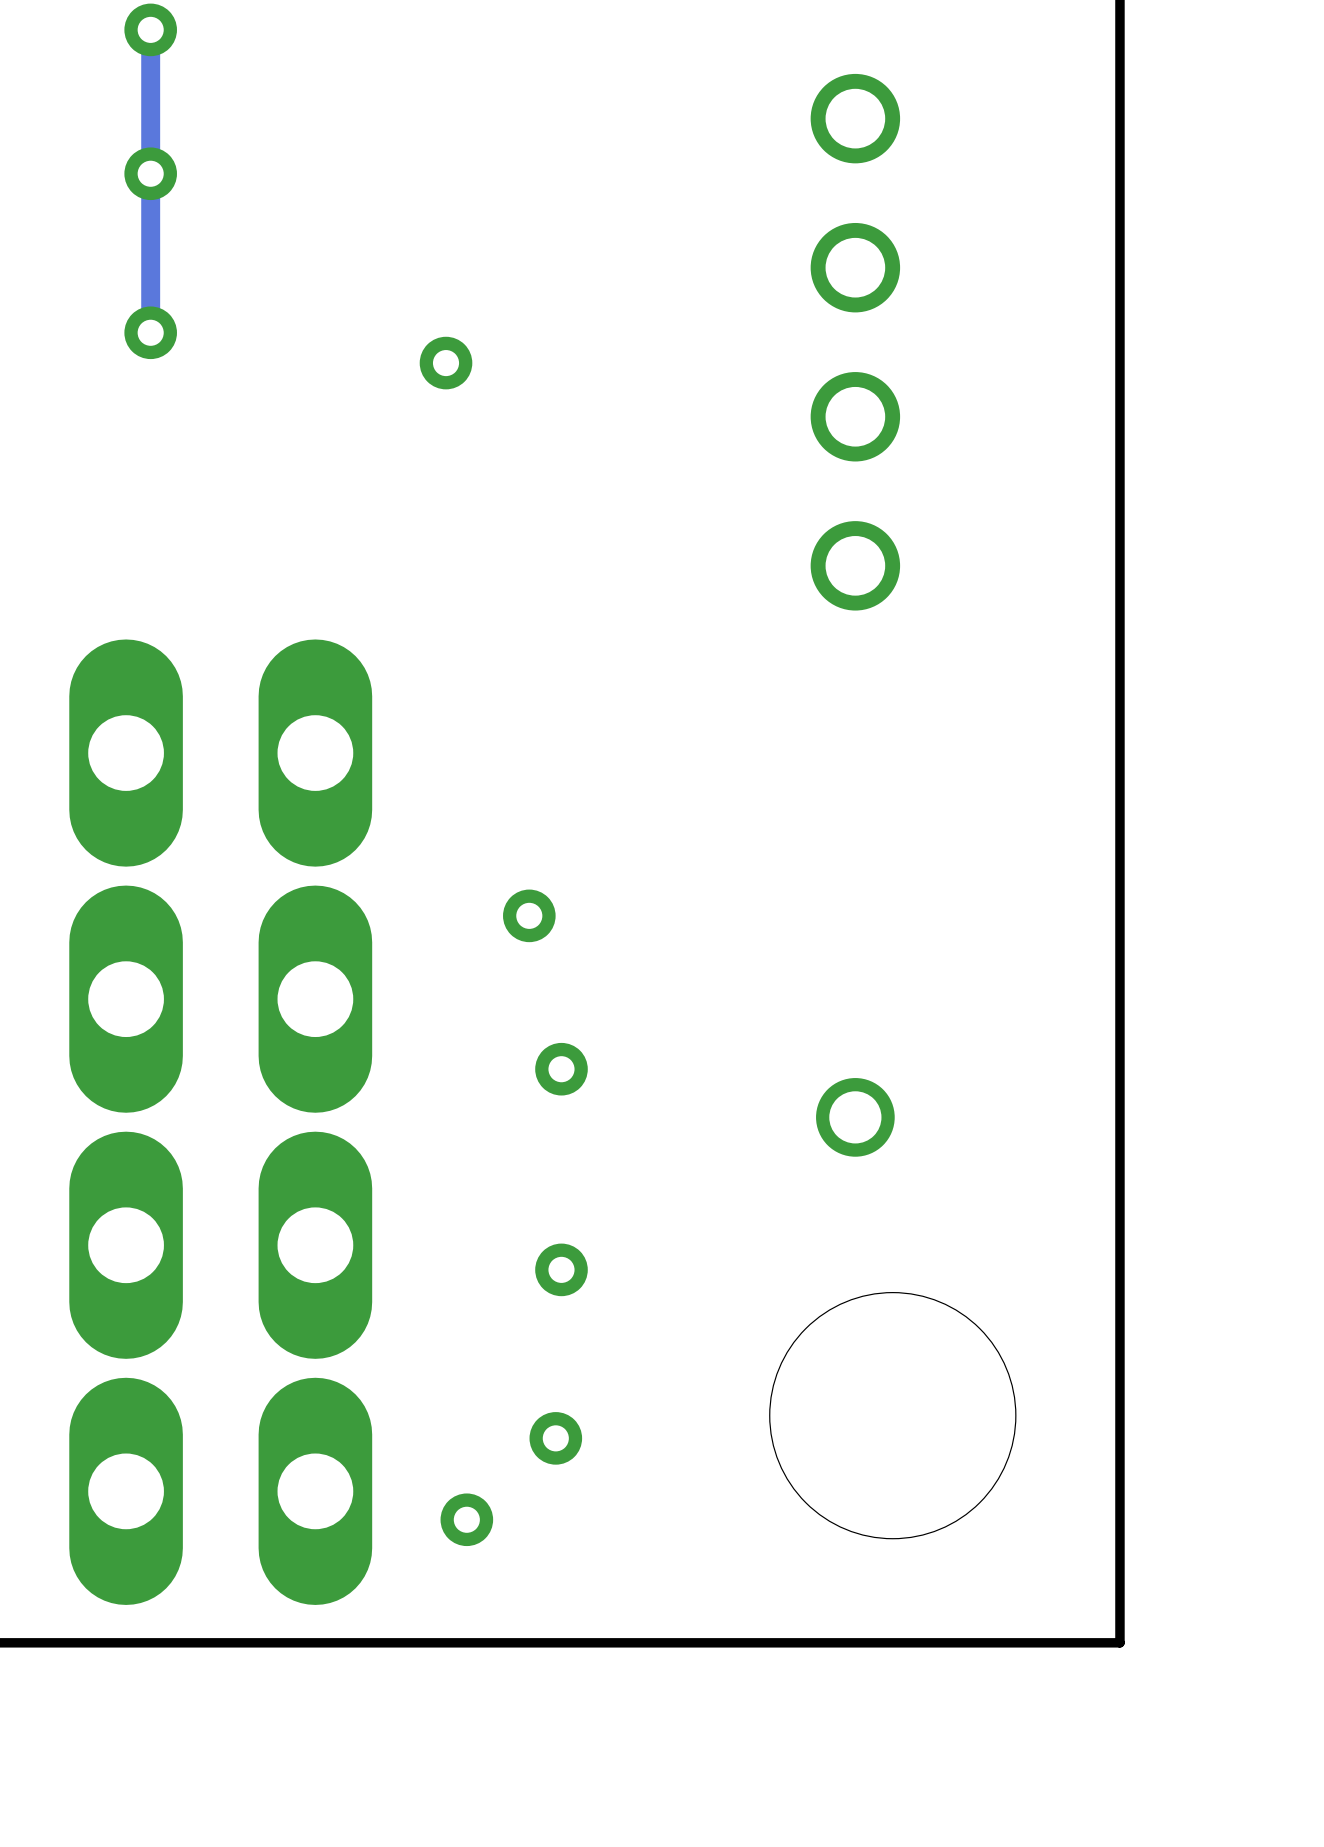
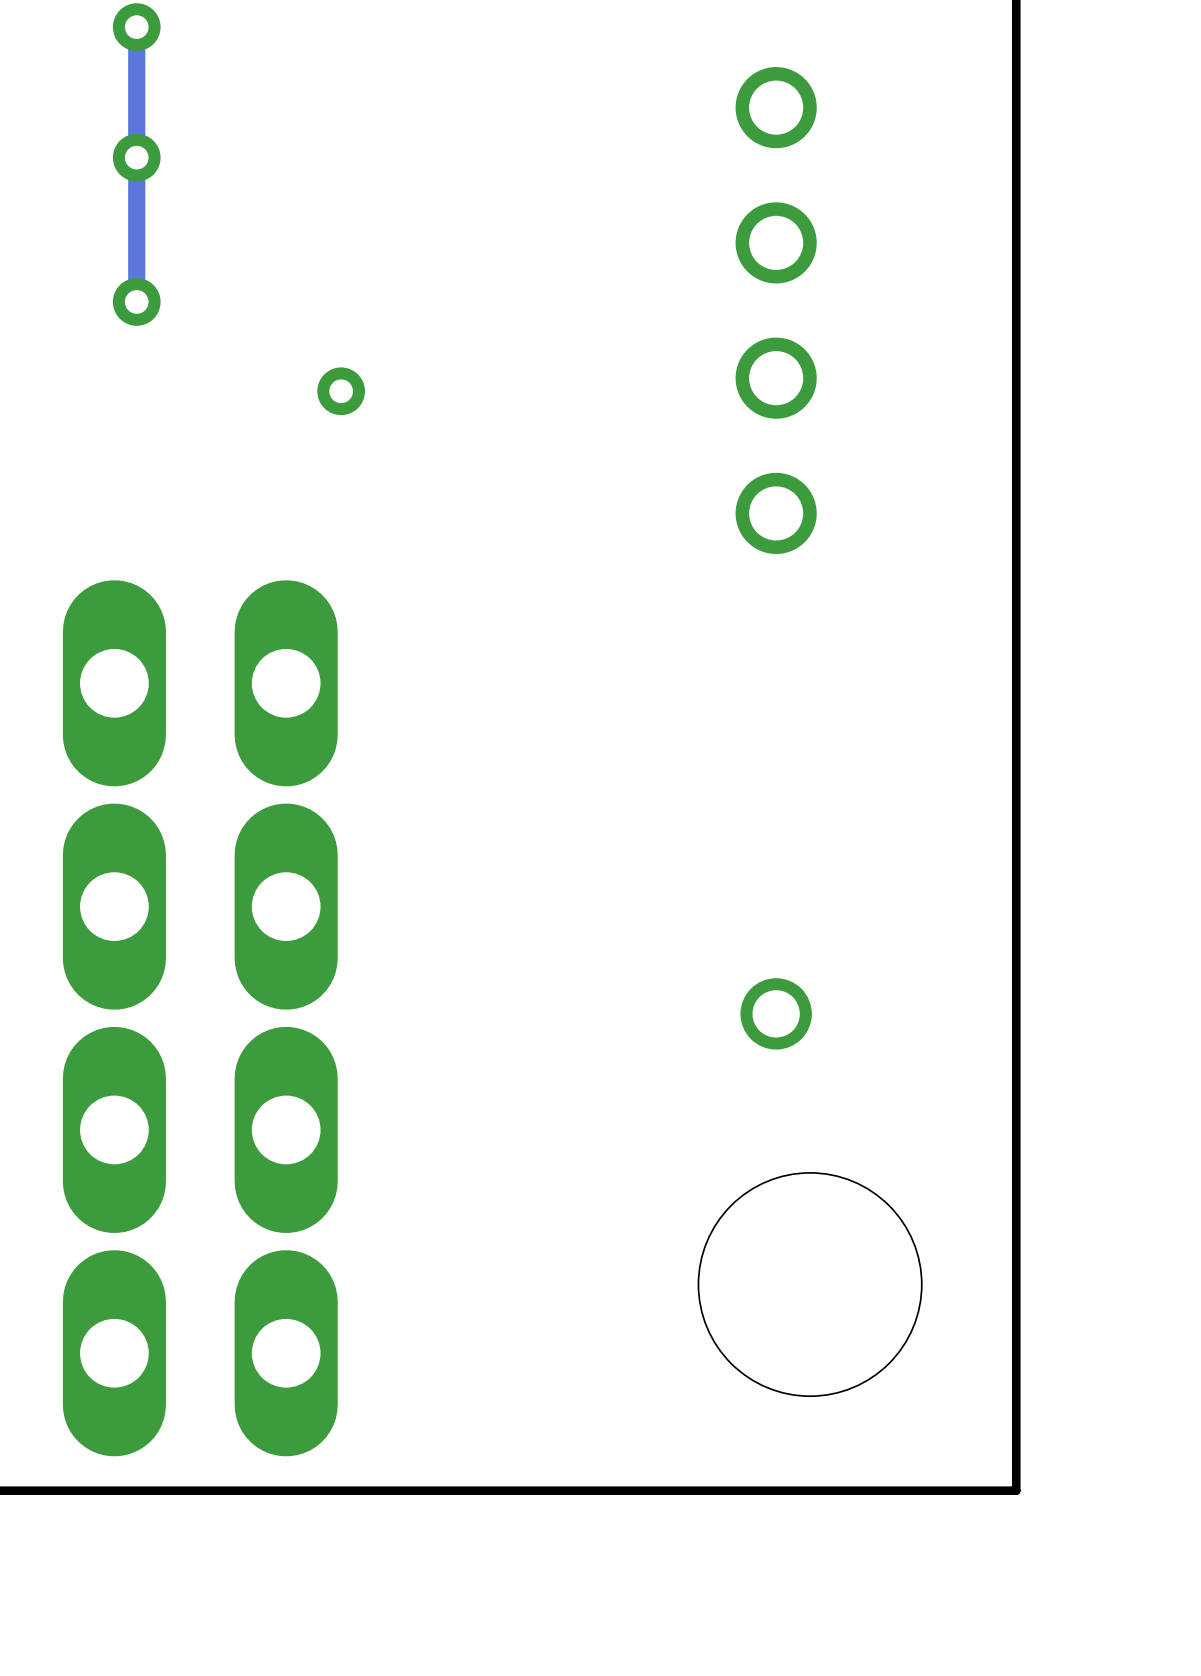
via position: (446, 363) -> (341, 391)
via: (529, 915) -> none
via: (561, 1069) -> none
via: (561, 1269) -> none
via: (555, 1438) -> none
via: (466, 1519) -> none

